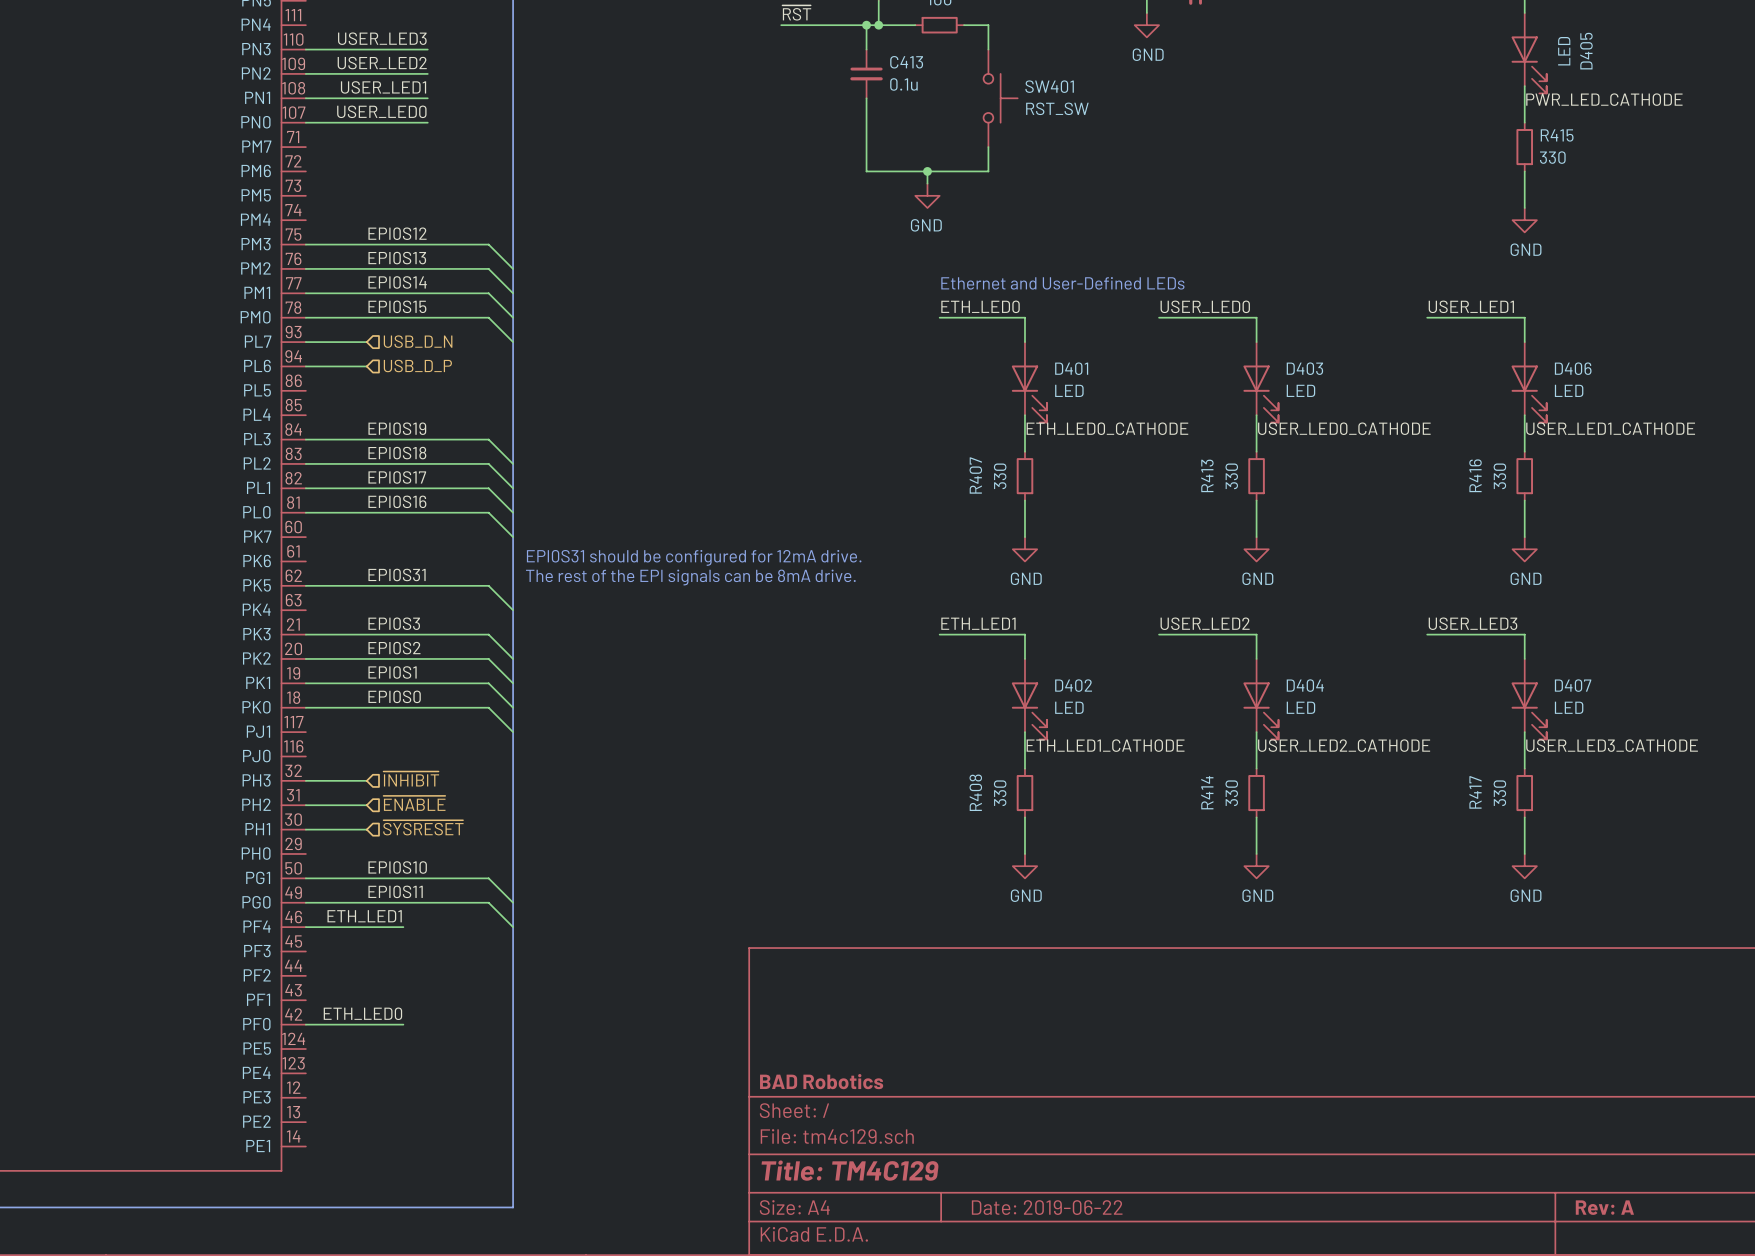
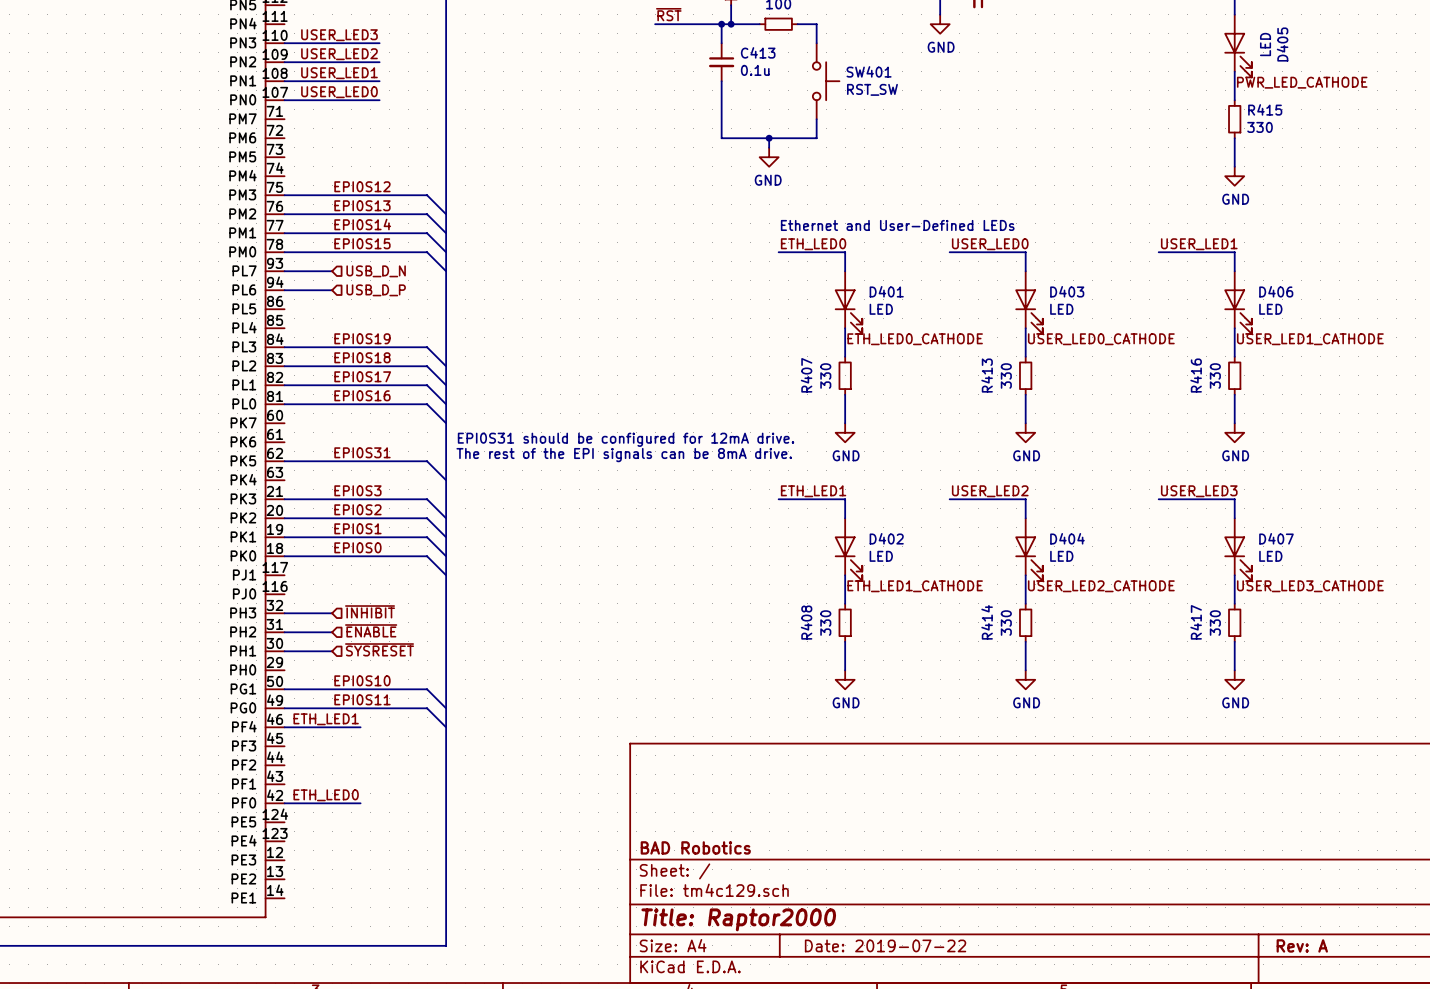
title block: Title: TM4C129 (850, 1170) -> Title: Raptor2000 (738, 919)
title block: Date: 2019-06-22 (1047, 1207) -> Date: 2019-07-22 (885, 945)

